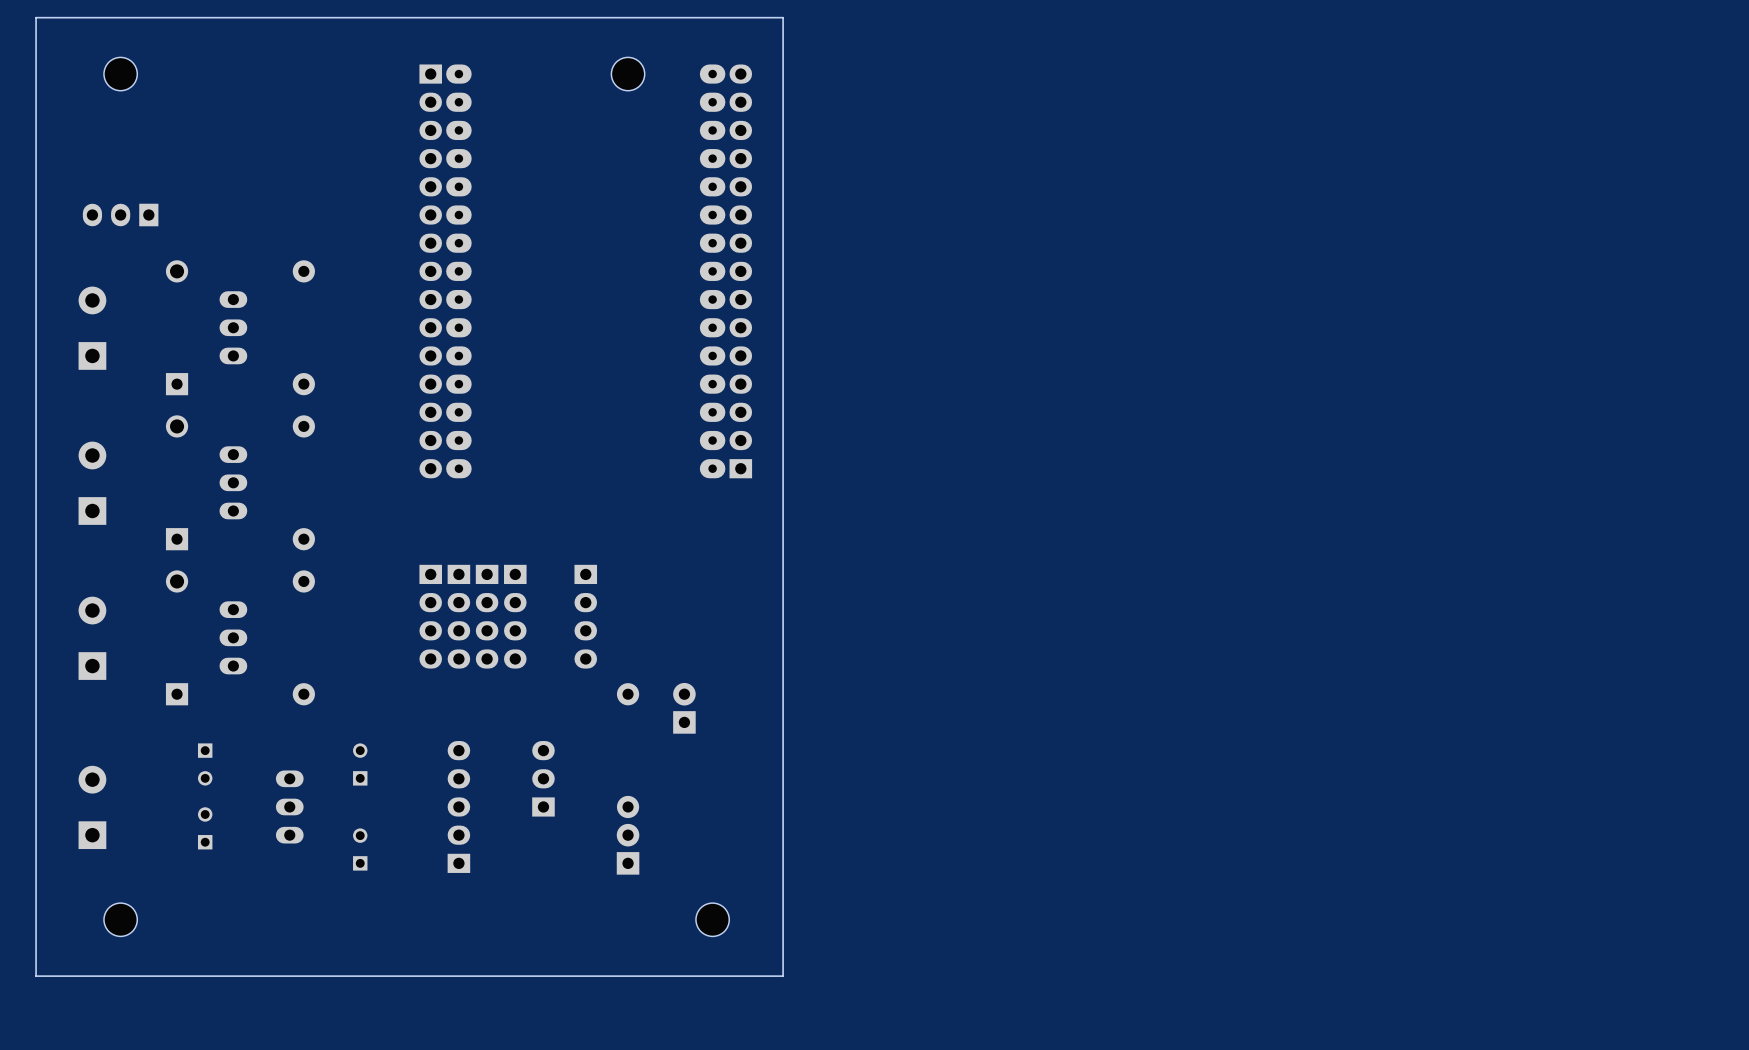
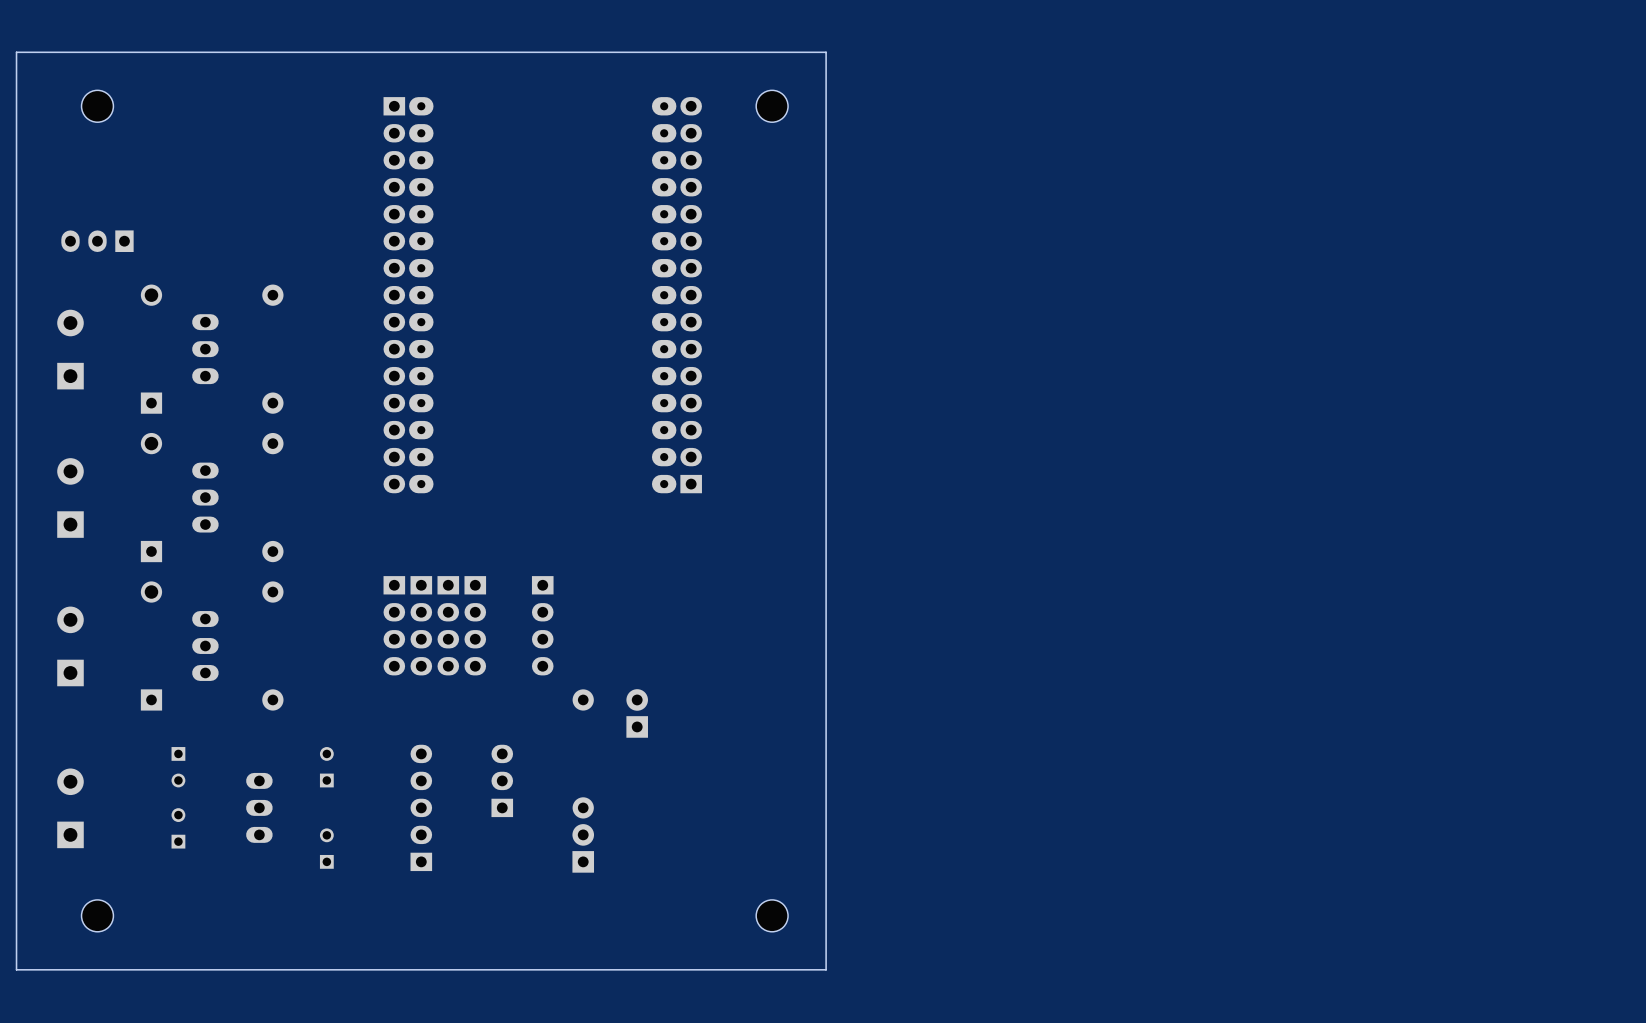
board edge: (783, 17) (783, 976) -> (731, 52) (826, 52) (826, 969) (731, 969)
part position: (628, 74) -> (772, 106)
part position: (712, 919) -> (772, 915)

